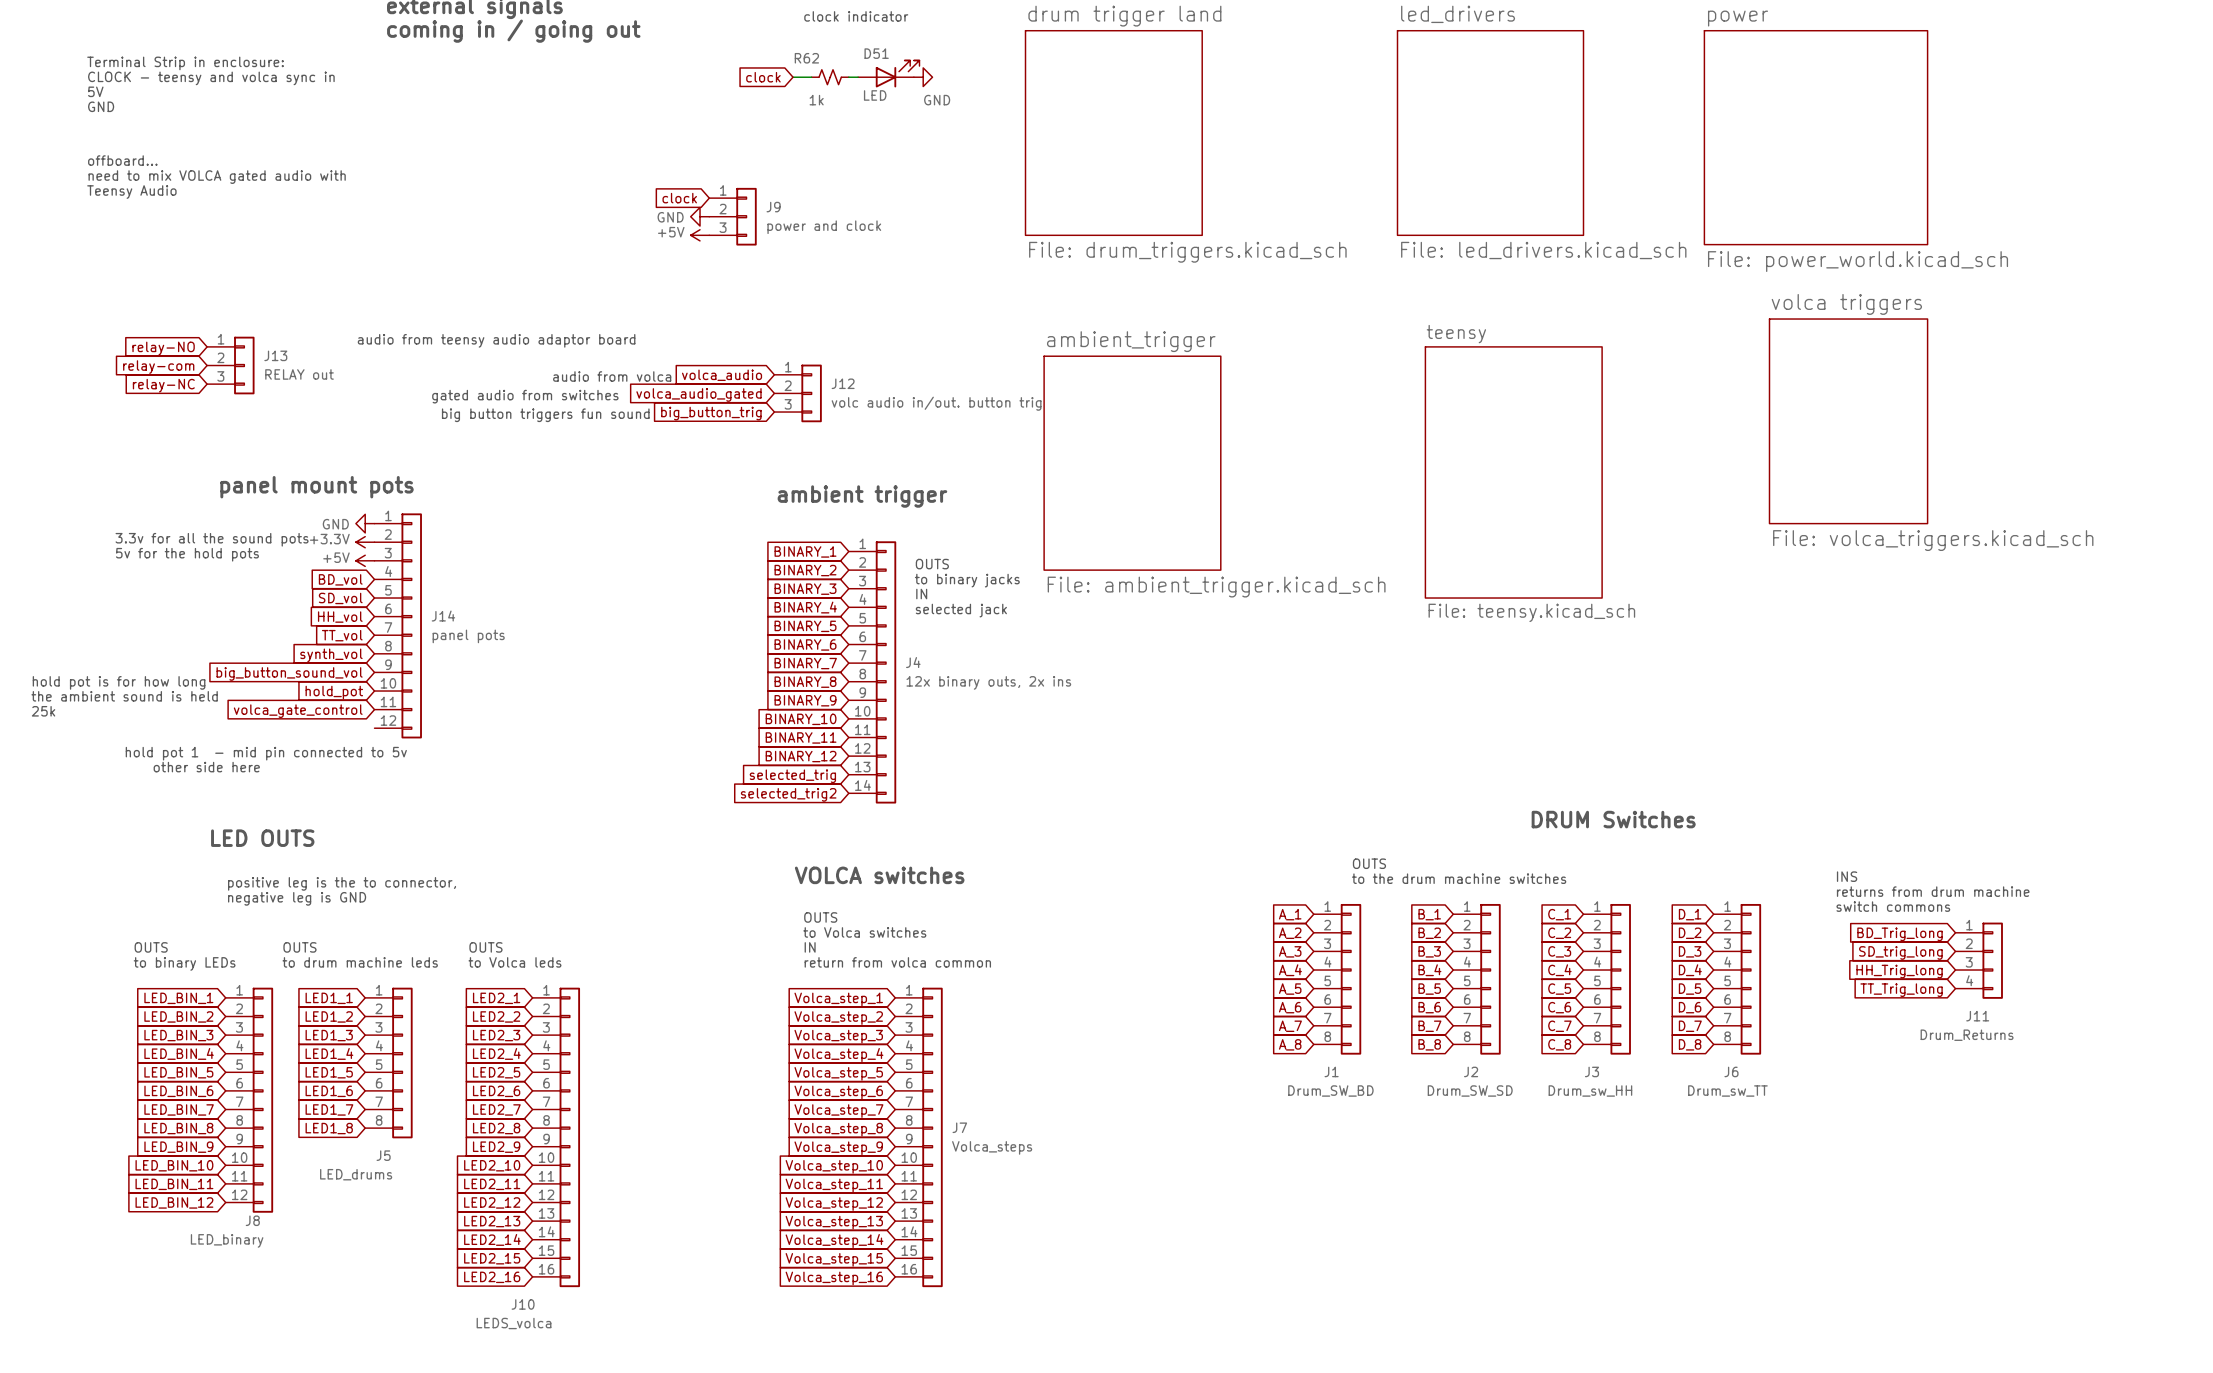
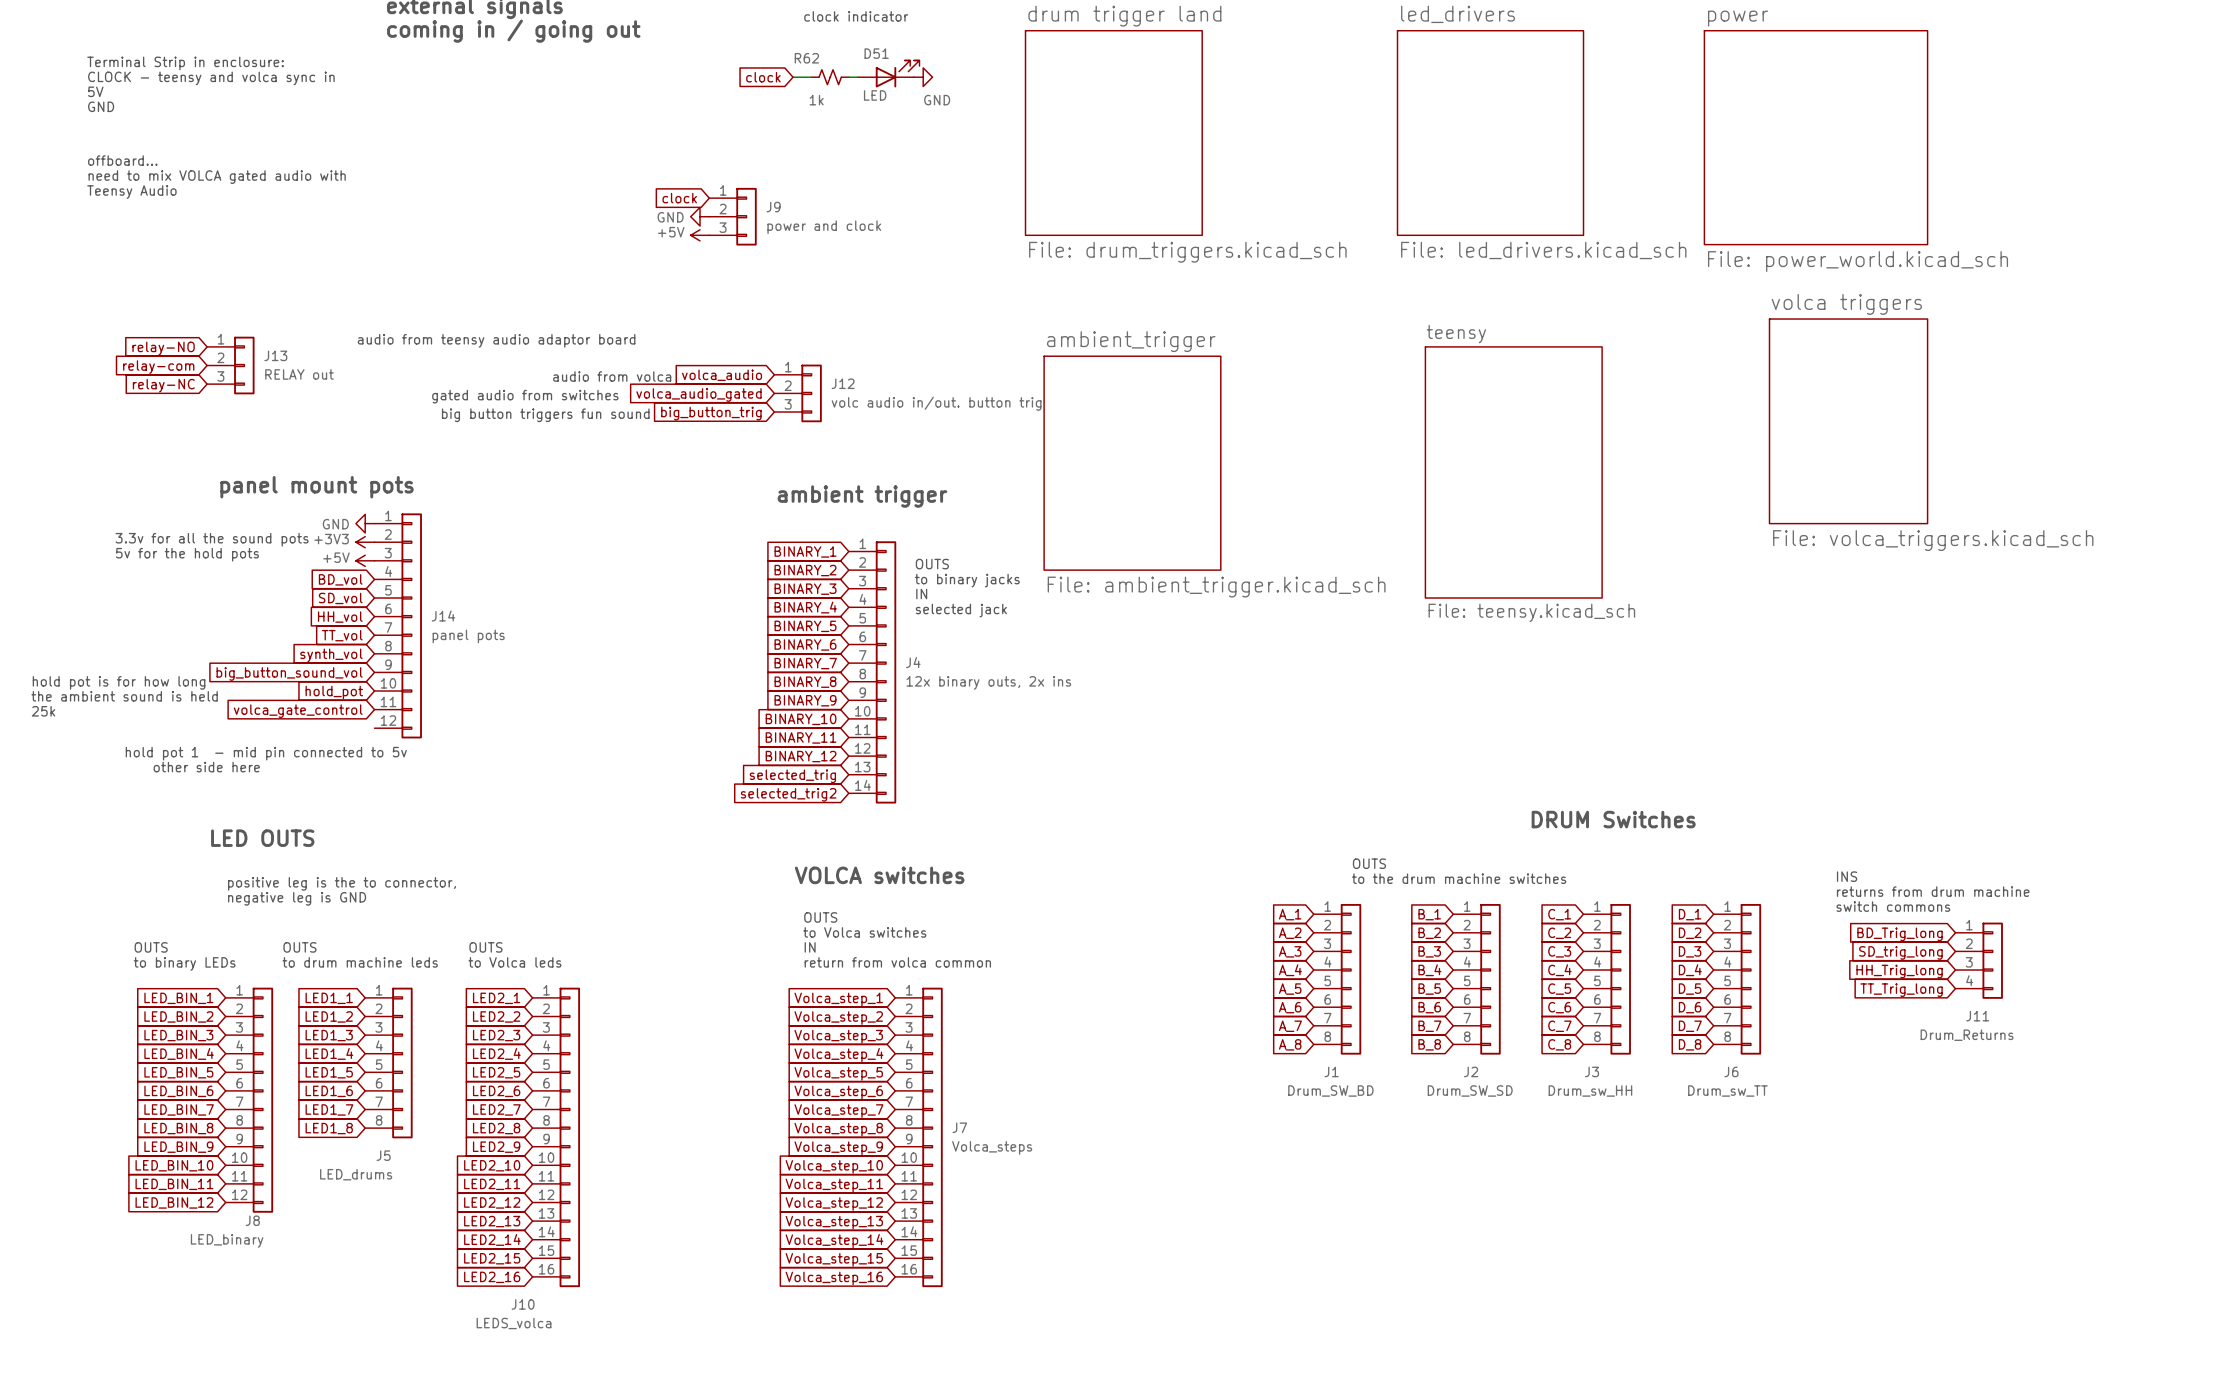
power symbol: +3.3V (365, 542) -> +3V3 (365, 542)

